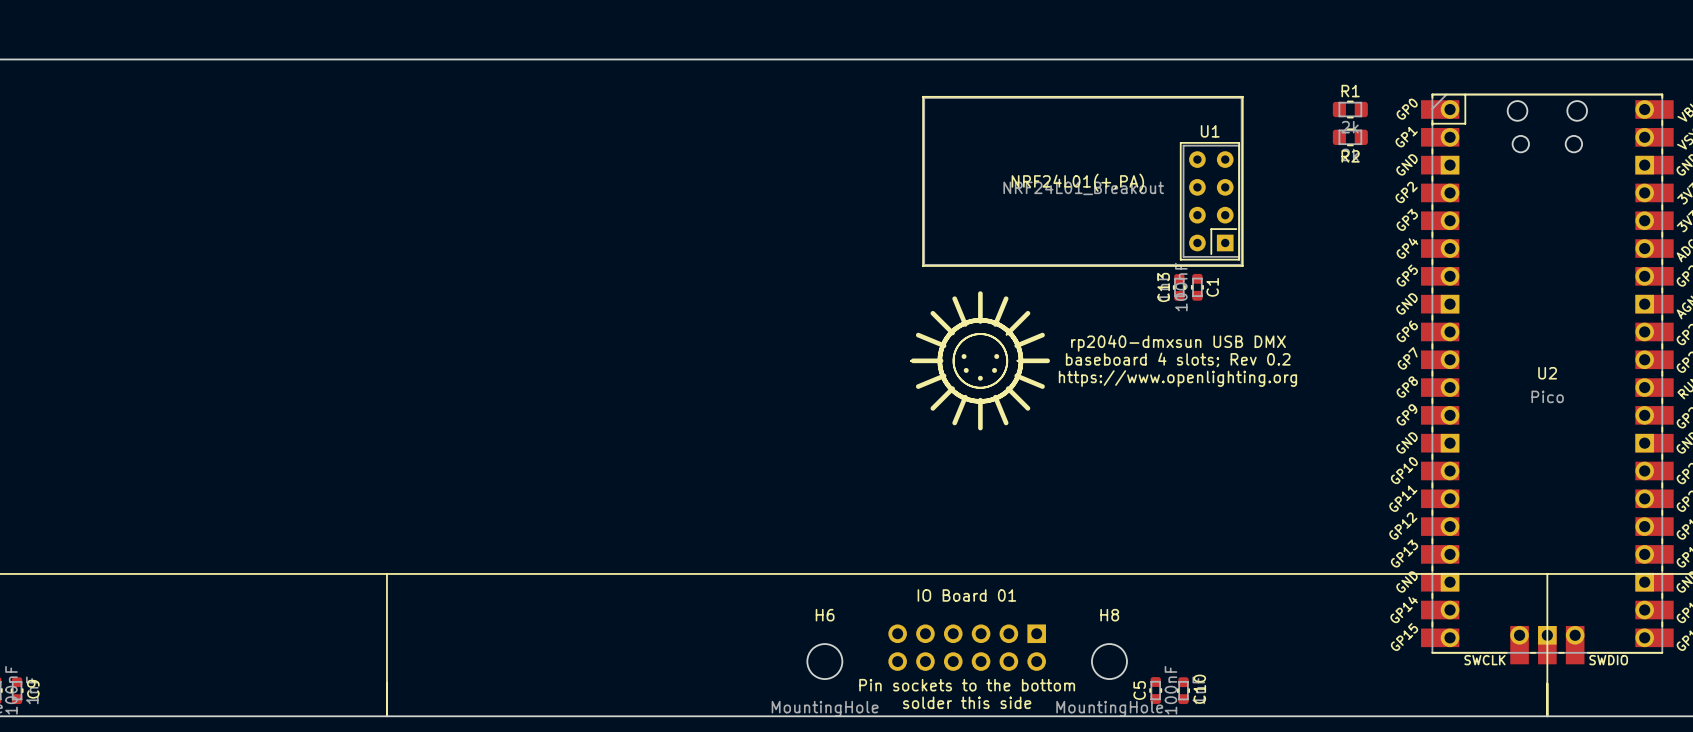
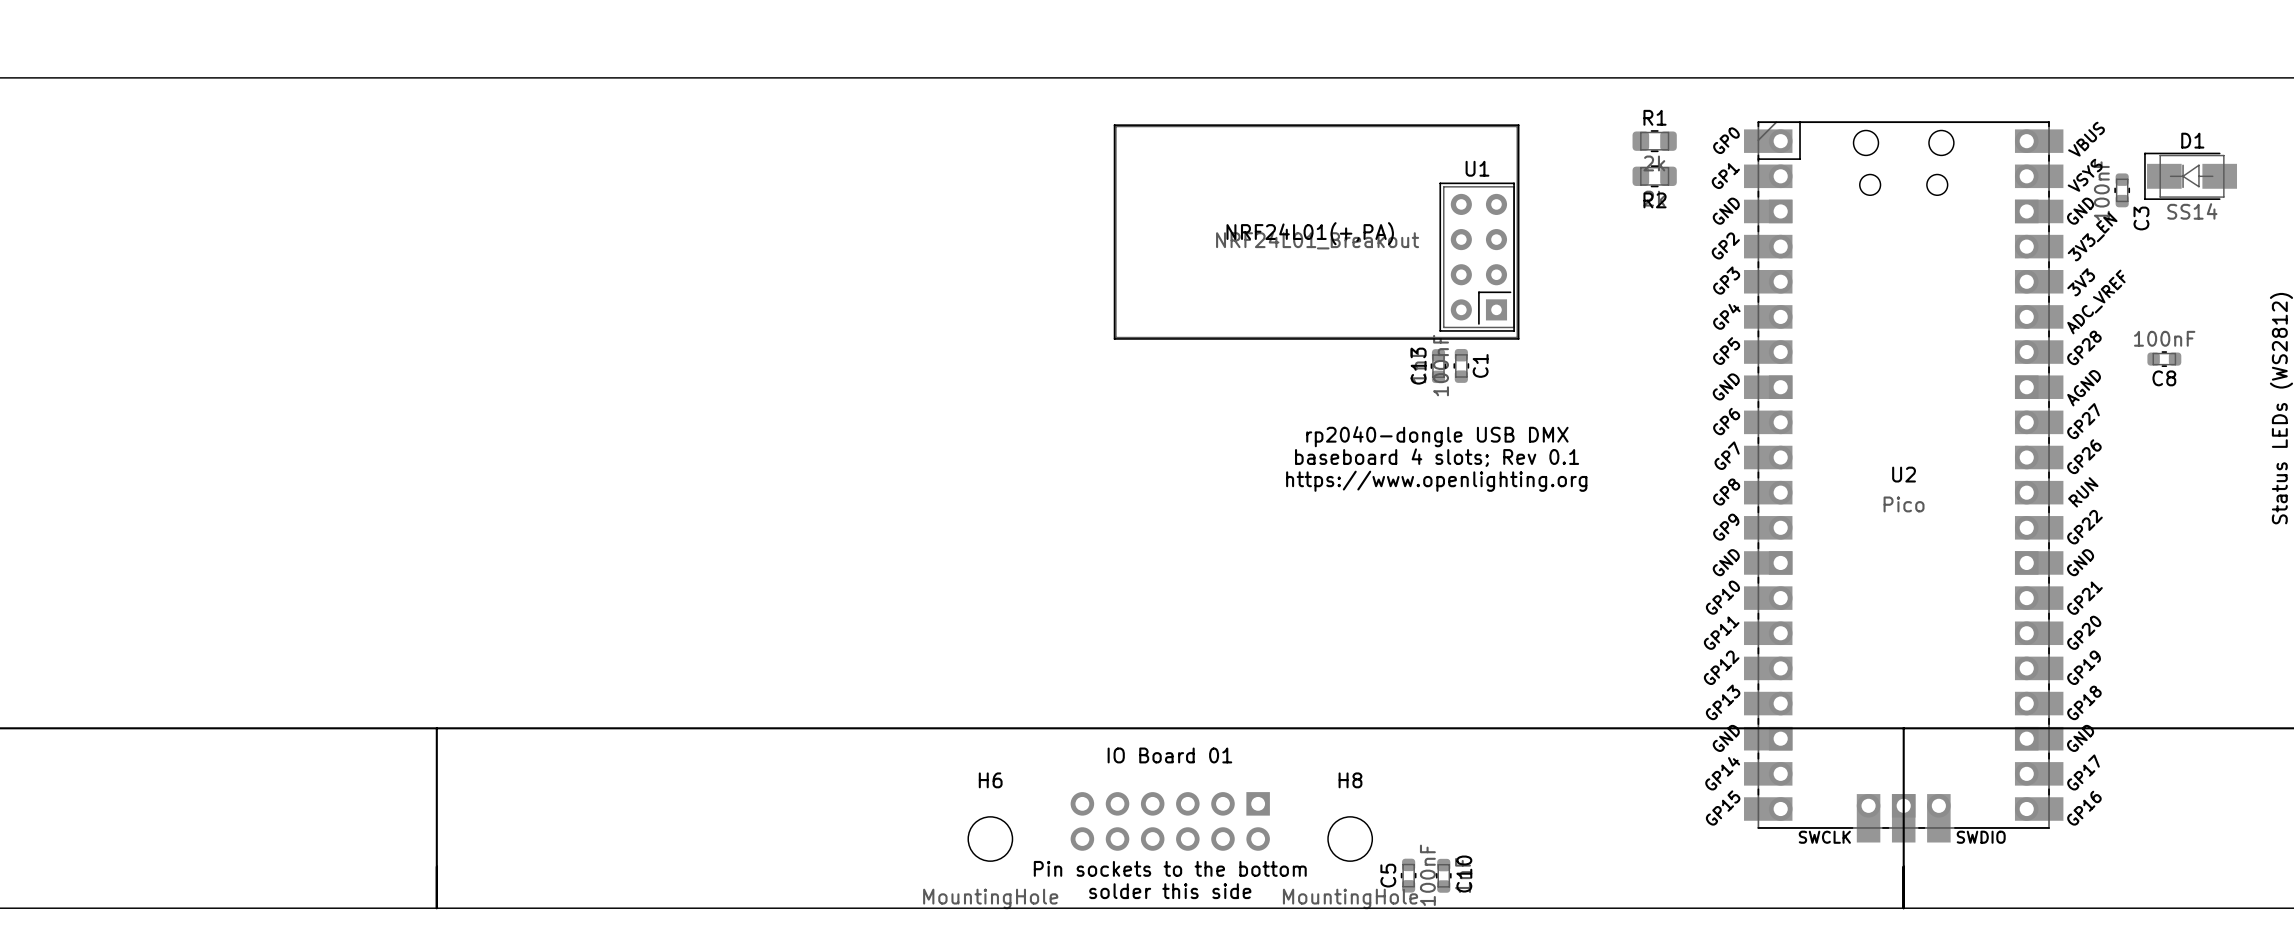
drawing: [910, 291, 1050, 431] -> none
line: (980, 320) (996, 323) (1009, 332) (1017, 345) (1020, 360) (1017, 376) (1009, 389) (996, 398) (980, 401) (964, 398) (951, 389) (943, 376) (939, 360) (943, 345) (951, 332) (964, 323) (980, 320) -> none
line: (979, 334) (968, 336) (960, 342) (955, 351) (953, 362) (956, 372) (962, 380) (971, 386) (981, 387) (992, 385) (1000, 378) (1005, 370) (1007, 359) (1004, 349) (998, 340) (989, 335) (979, 334) -> none
text: rp2040-dmxsun USB DMX (1178, 343) -> rp2040-dongle USB DMX (1437, 436)
drawing: [961, 354, 1000, 381] -> none
text: baseboard 4 slots; Rev 0.2 (1178, 359) -> baseboard 4 slots; Rev 0.1 (1437, 457)

